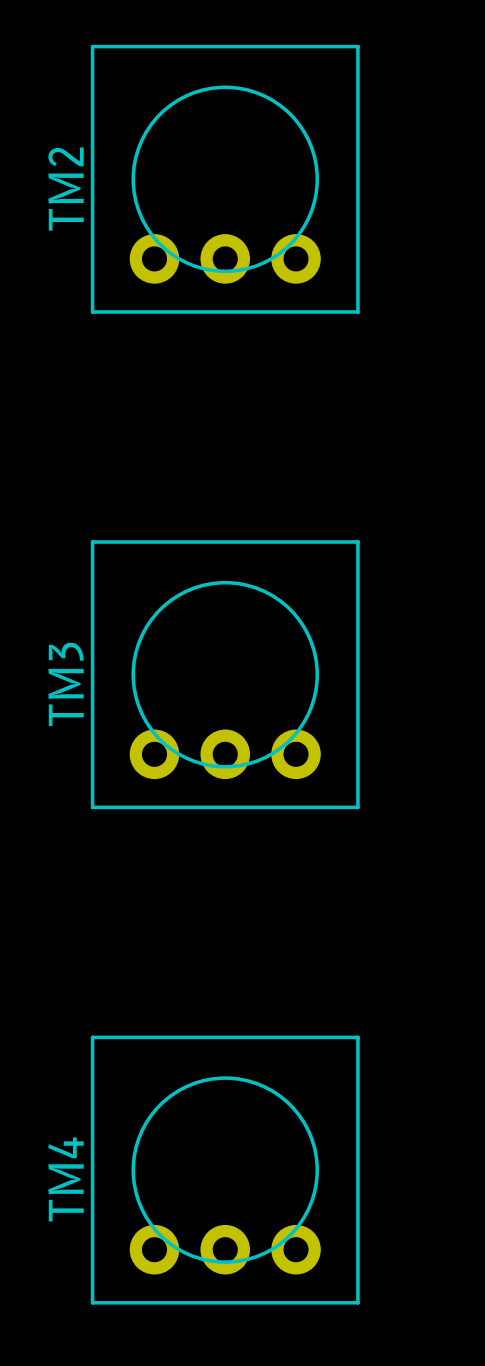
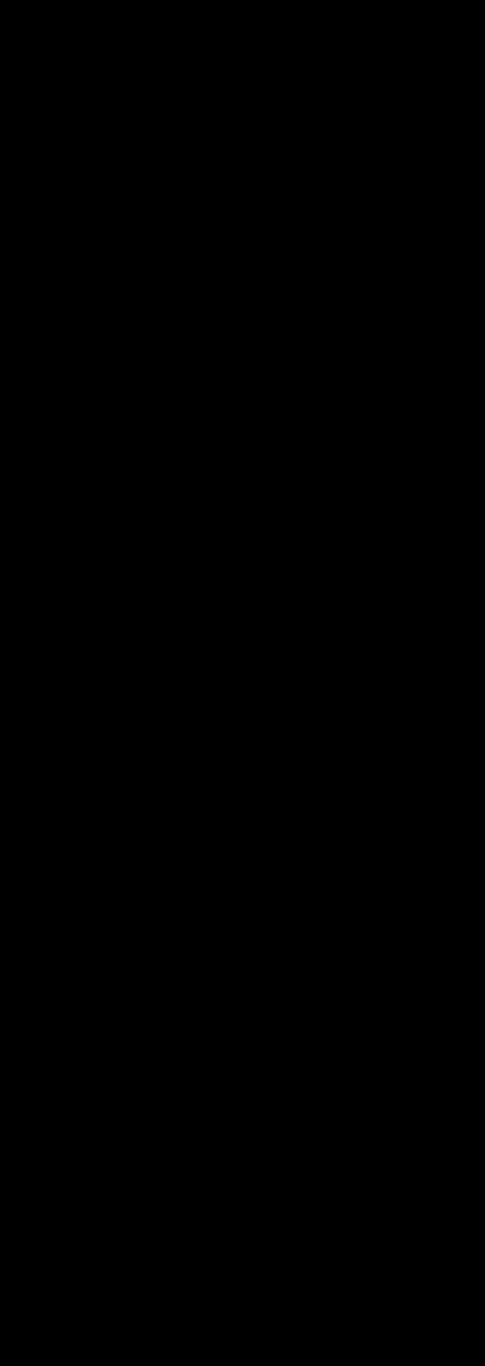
TM2: (225, 179) -> none
TM3: (225, 674) -> none
TM4: (225, 1170) -> none

